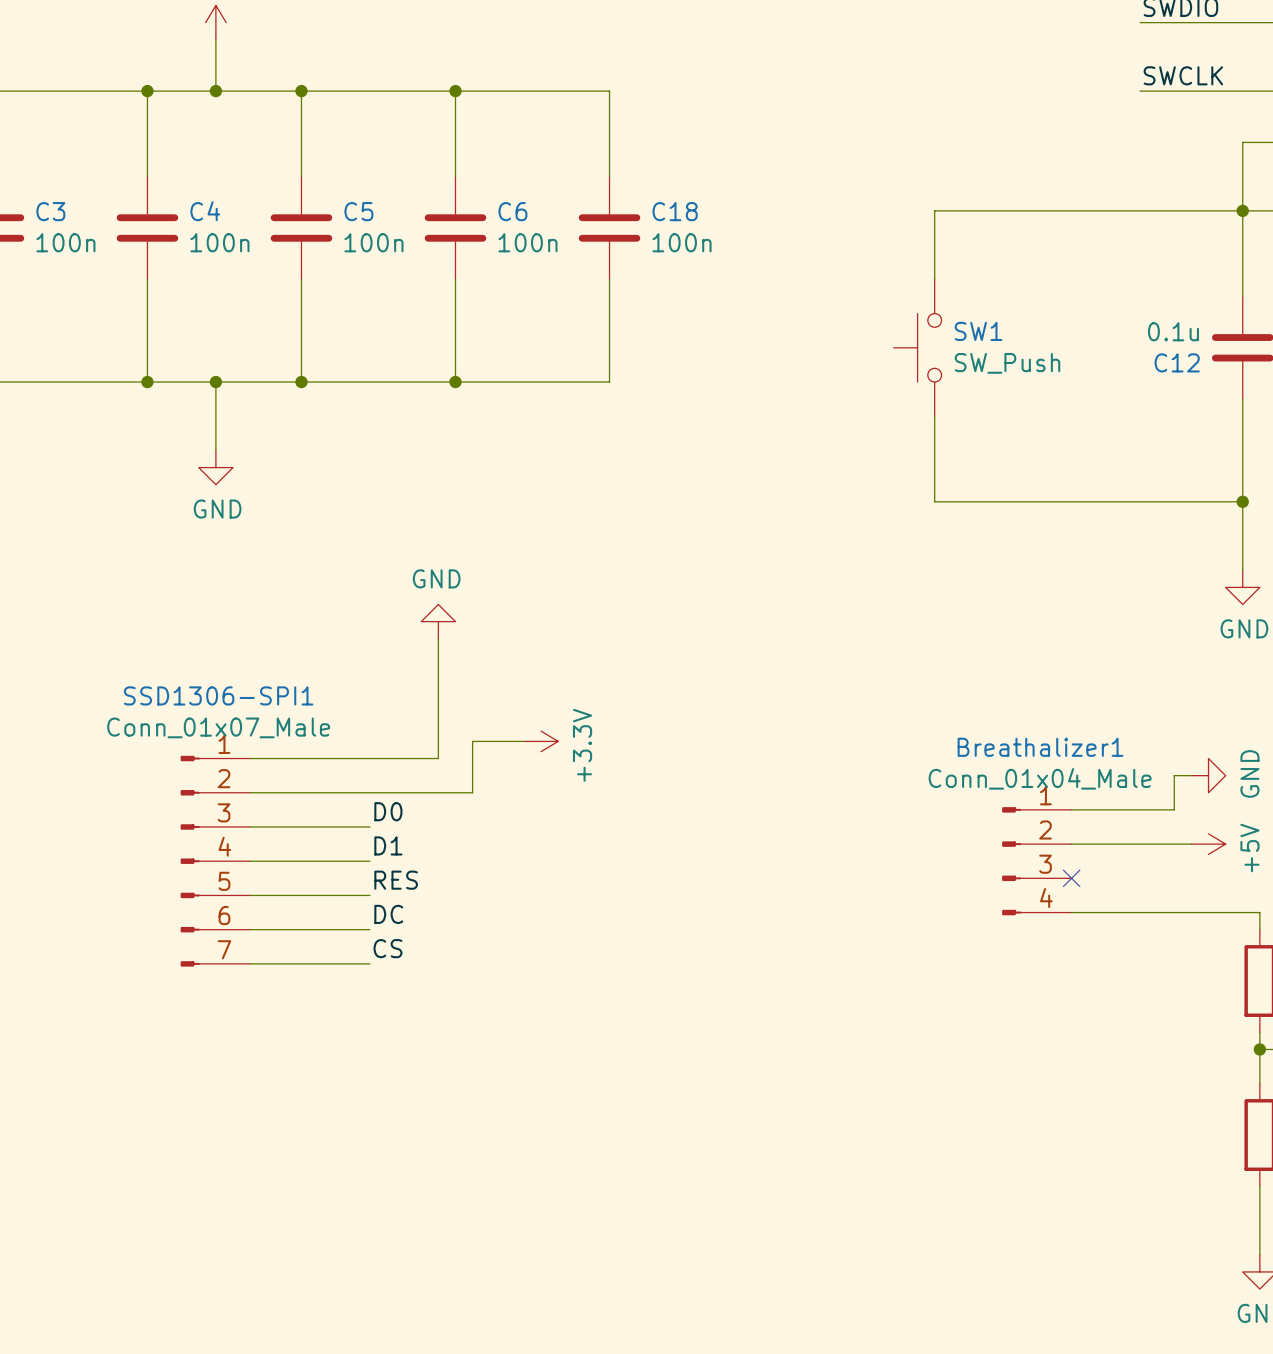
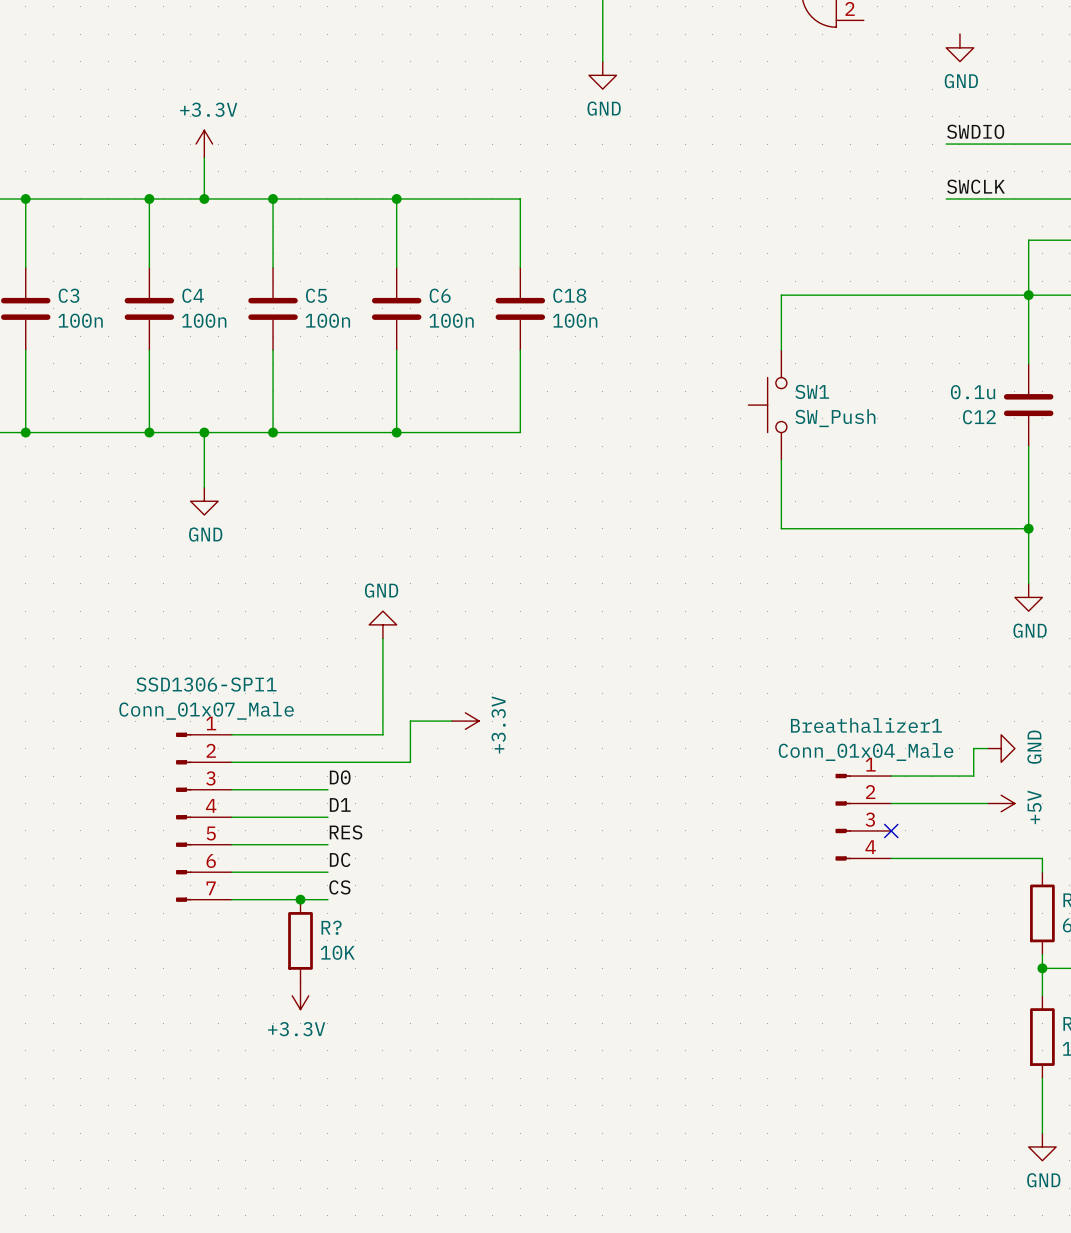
junction: none -> (300, 899)
R?: none -> 10K (300, 940)
power symbol: none -> +3.3V (300, 995)

